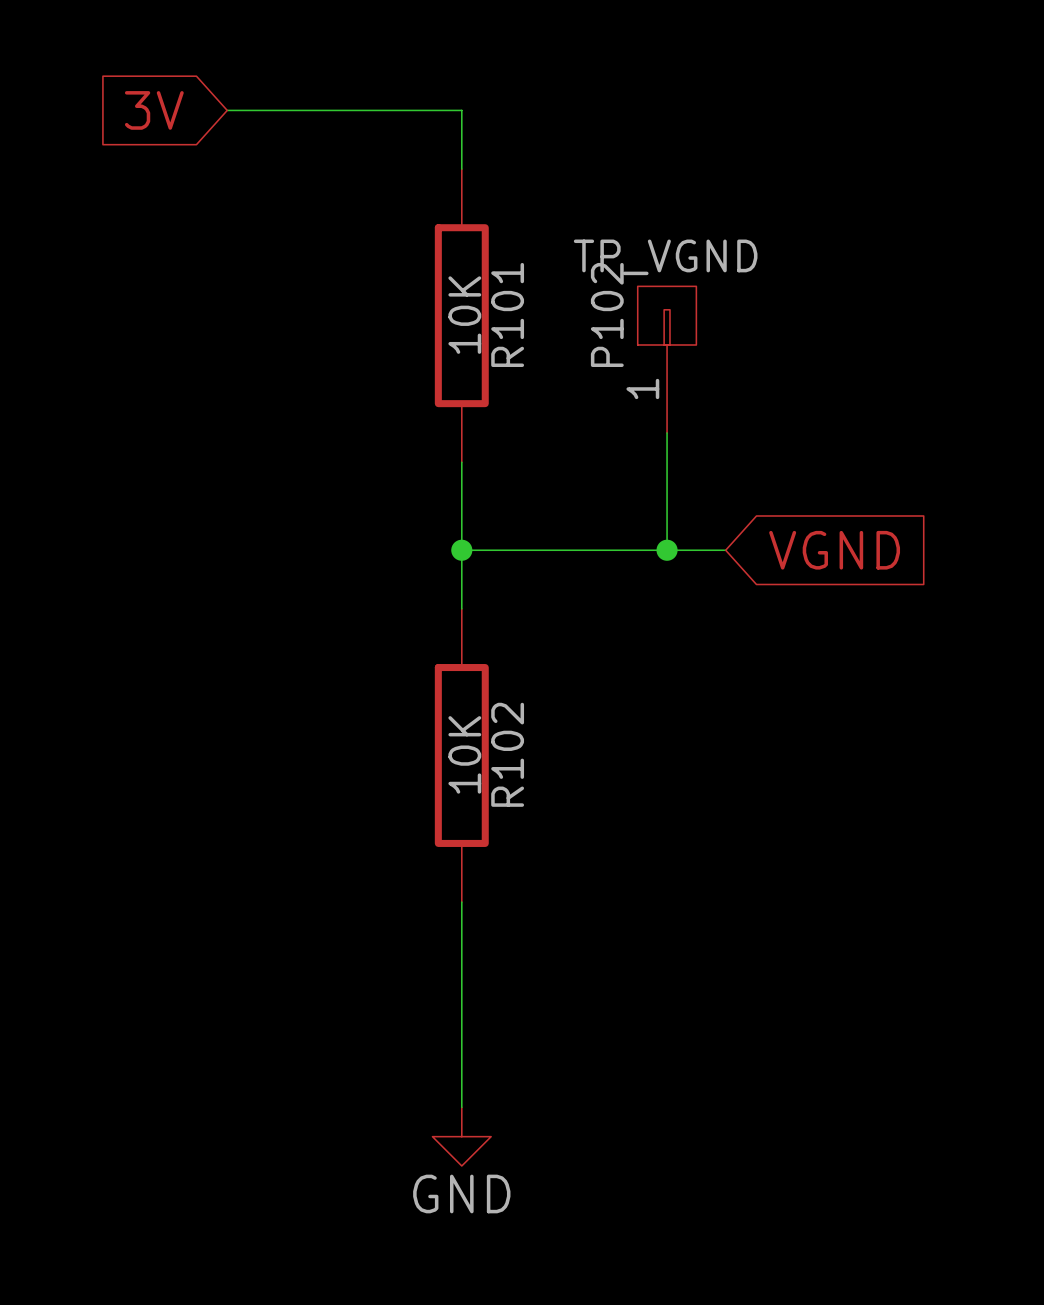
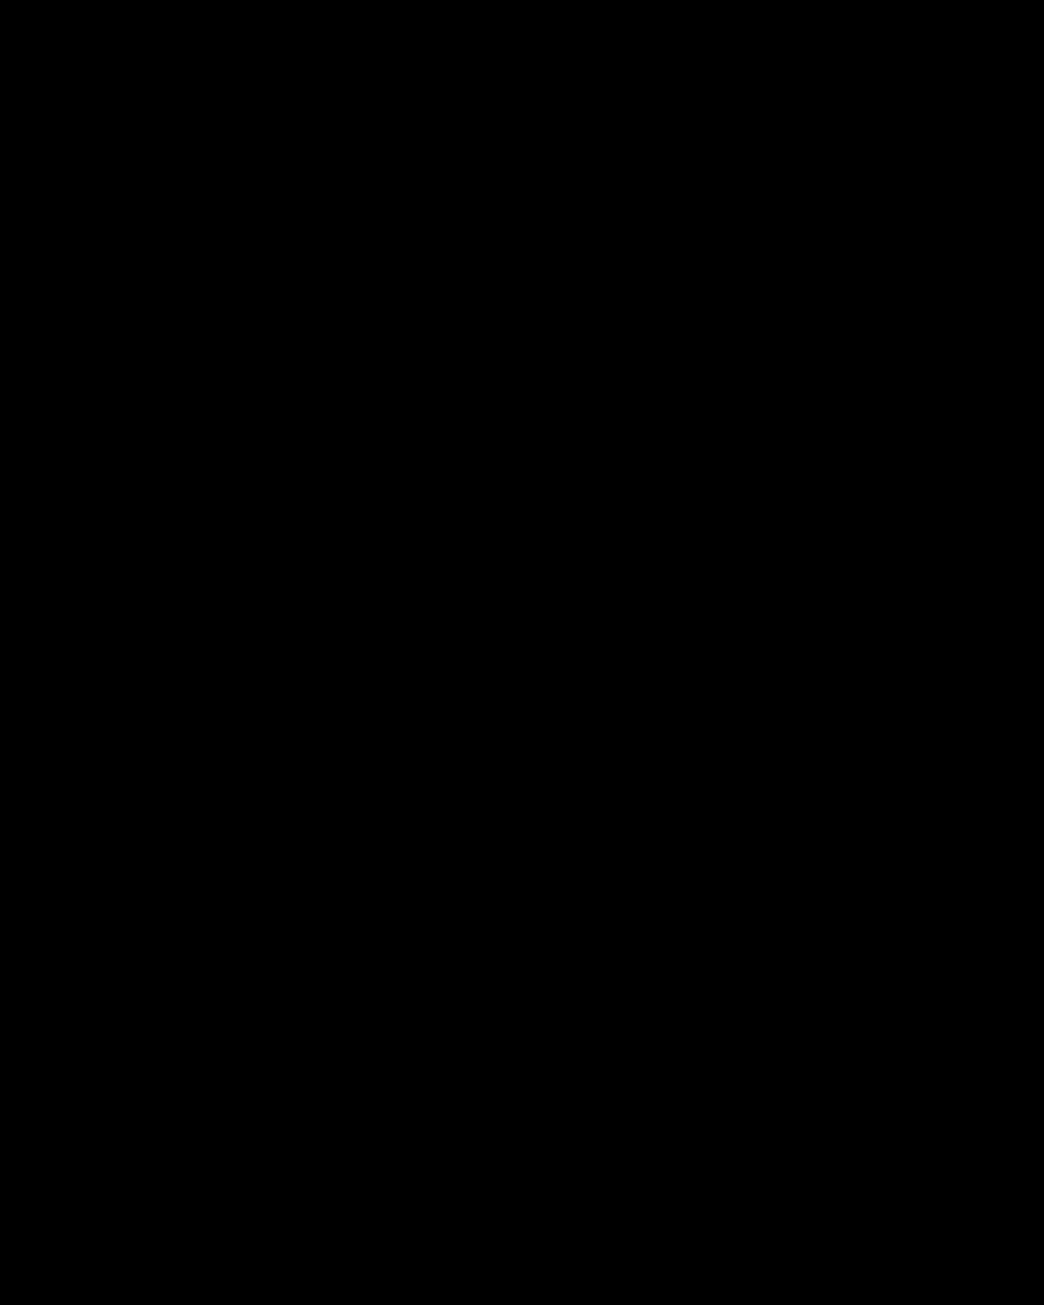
global label: 3V (154, 110) -> none
wire: (227, 110) (461, 110) (461, 169) -> none
R101: 10K (461, 315) -> none
P102: TP_VGND (667, 359) -> none
wire: (667, 432) (667, 550) -> none
wire: (461, 462) (461, 608) -> none
wire: (461, 550) (725, 550) -> none
junction: (461, 550) -> none
junction: (667, 550) -> none
global label: VGND (834, 550) -> none
R102: 10K (461, 755) -> none
wire: (461, 902) (461, 1107) -> none
power symbol: GND (461, 1136) -> none

